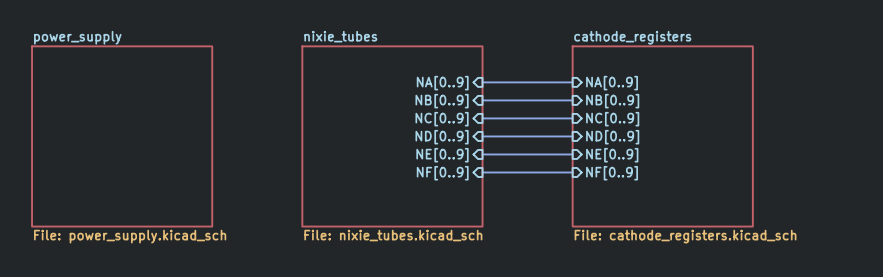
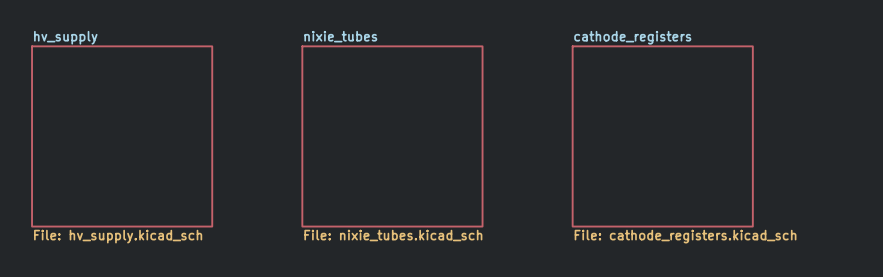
sheet power_supply name: power_supply (77, 37) -> hv_supply (65, 37)
bus: (482, 82) (572, 82) -> none
sheet pin: NA[0..9] (442, 83) -> none
sheet pin: NA[0..9] (612, 83) -> none
bus: (482, 100) (572, 100) -> none
sheet pin: NB[0..9] (442, 101) -> none
sheet pin: NB[0..9] (612, 101) -> none
bus: (482, 118) (572, 118) -> none
sheet pin: NC[0..9] (442, 119) -> none
sheet pin: NC[0..9] (612, 119) -> none
bus: (482, 136) (572, 136) -> none
sheet pin: ND[0..9] (442, 137) -> none
sheet pin: ND[0..9] (612, 137) -> none
bus: (482, 154) (572, 154) -> none
sheet pin: NE[0..9] (442, 155) -> none
sheet pin: NE[0..9] (612, 155) -> none
bus: (482, 172) (572, 172) -> none
sheet pin: NF[0..9] (442, 173) -> none
sheet pin: NF[0..9] (612, 173) -> none
sheet power_supply value: File: power_supply.kicad_sch (130, 236) -> File: hv_supply.kicad_sch (118, 236)

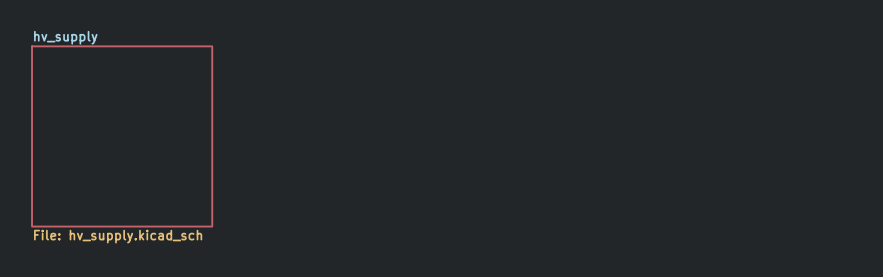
sheet nixie_tubes: File: nixie_tubes.kicad_sch (392, 136) -> none
sheet cathode_registers: File: cathode_registers.kicad_sch (662, 136) -> none

